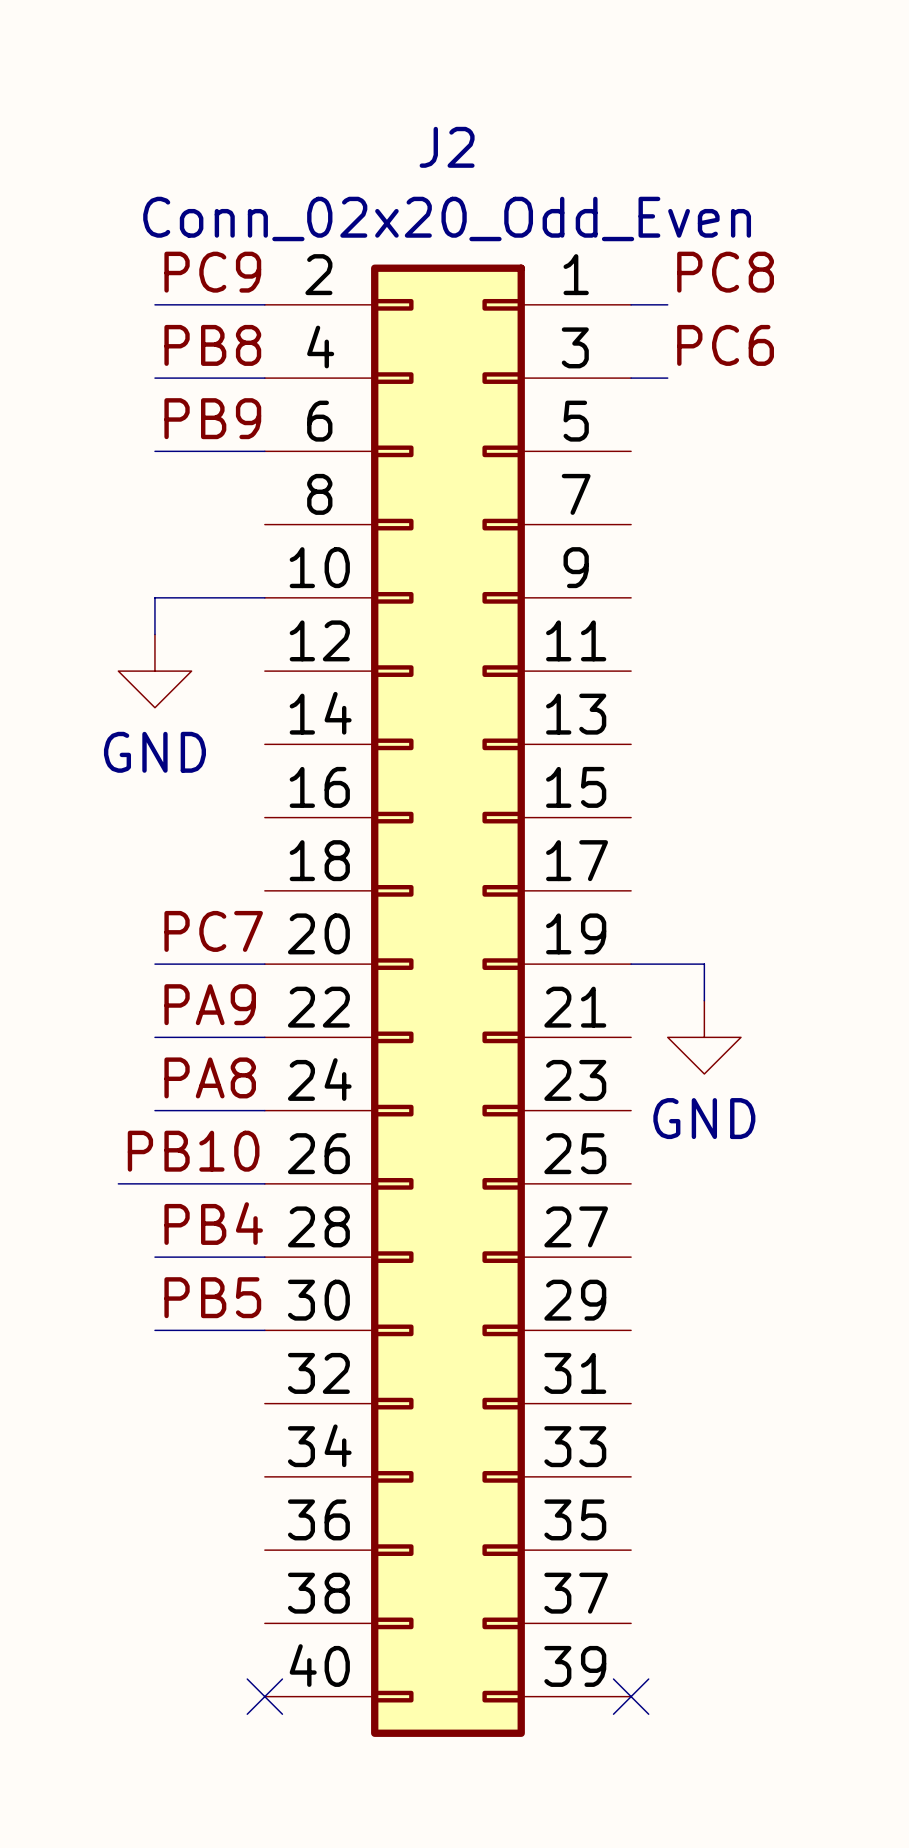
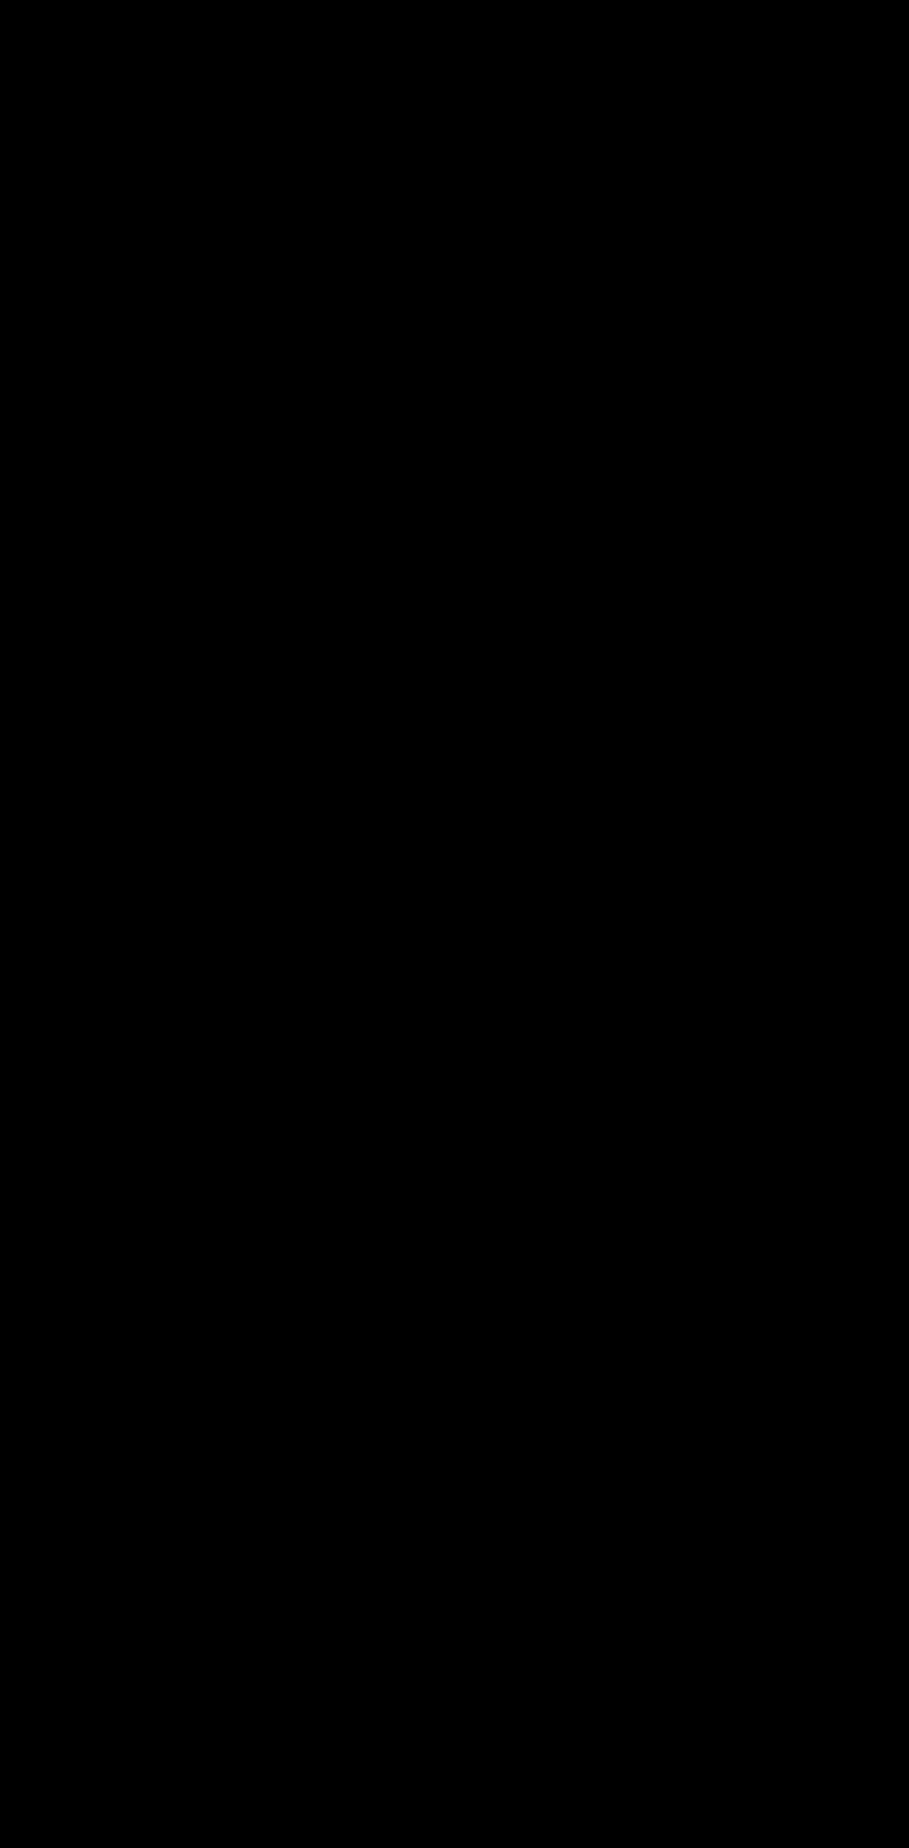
label: PC9 (212, 272) -> none
label: PC8 (725, 272) -> none
wire: (154, 304) (264, 304) -> none
wire: (631, 304) (667, 304) -> none
label: PB8 (212, 345) -> none
label: PC6 (725, 345) -> none
wire: (154, 378) (264, 378) -> none
wire: (631, 378) (667, 378) -> none
label: PB9 (212, 418) -> none
wire: (154, 451) (264, 451) -> none
wire: (264, 597) (154, 597) (154, 634) -> none
power symbol: GND (154, 671) -> none
label: PC7 (213, 931) -> none
wire: (154, 964) (264, 964) -> none
wire: (631, 964) (704, 964) (704, 1000) -> none
J2: Conn_02x20_Odd_Even (447, 1000) -> none
label: PA9 (210, 1004) -> none
wire: (154, 1037) (264, 1037) -> none
power symbol: GND (704, 1037) -> none
label: PA8 (210, 1077) -> none
wire: (154, 1110) (264, 1110) -> none
label: PB10 (193, 1151) -> none
wire: (118, 1183) (264, 1183) -> none
label: PB4 (213, 1223) -> none
wire: (154, 1257) (264, 1257) -> none
label: PB5 (212, 1297) -> none
wire: (154, 1330) (264, 1330) -> none
no-connect mark: (264, 1696) -> none
no-connect mark: (631, 1696) -> none

